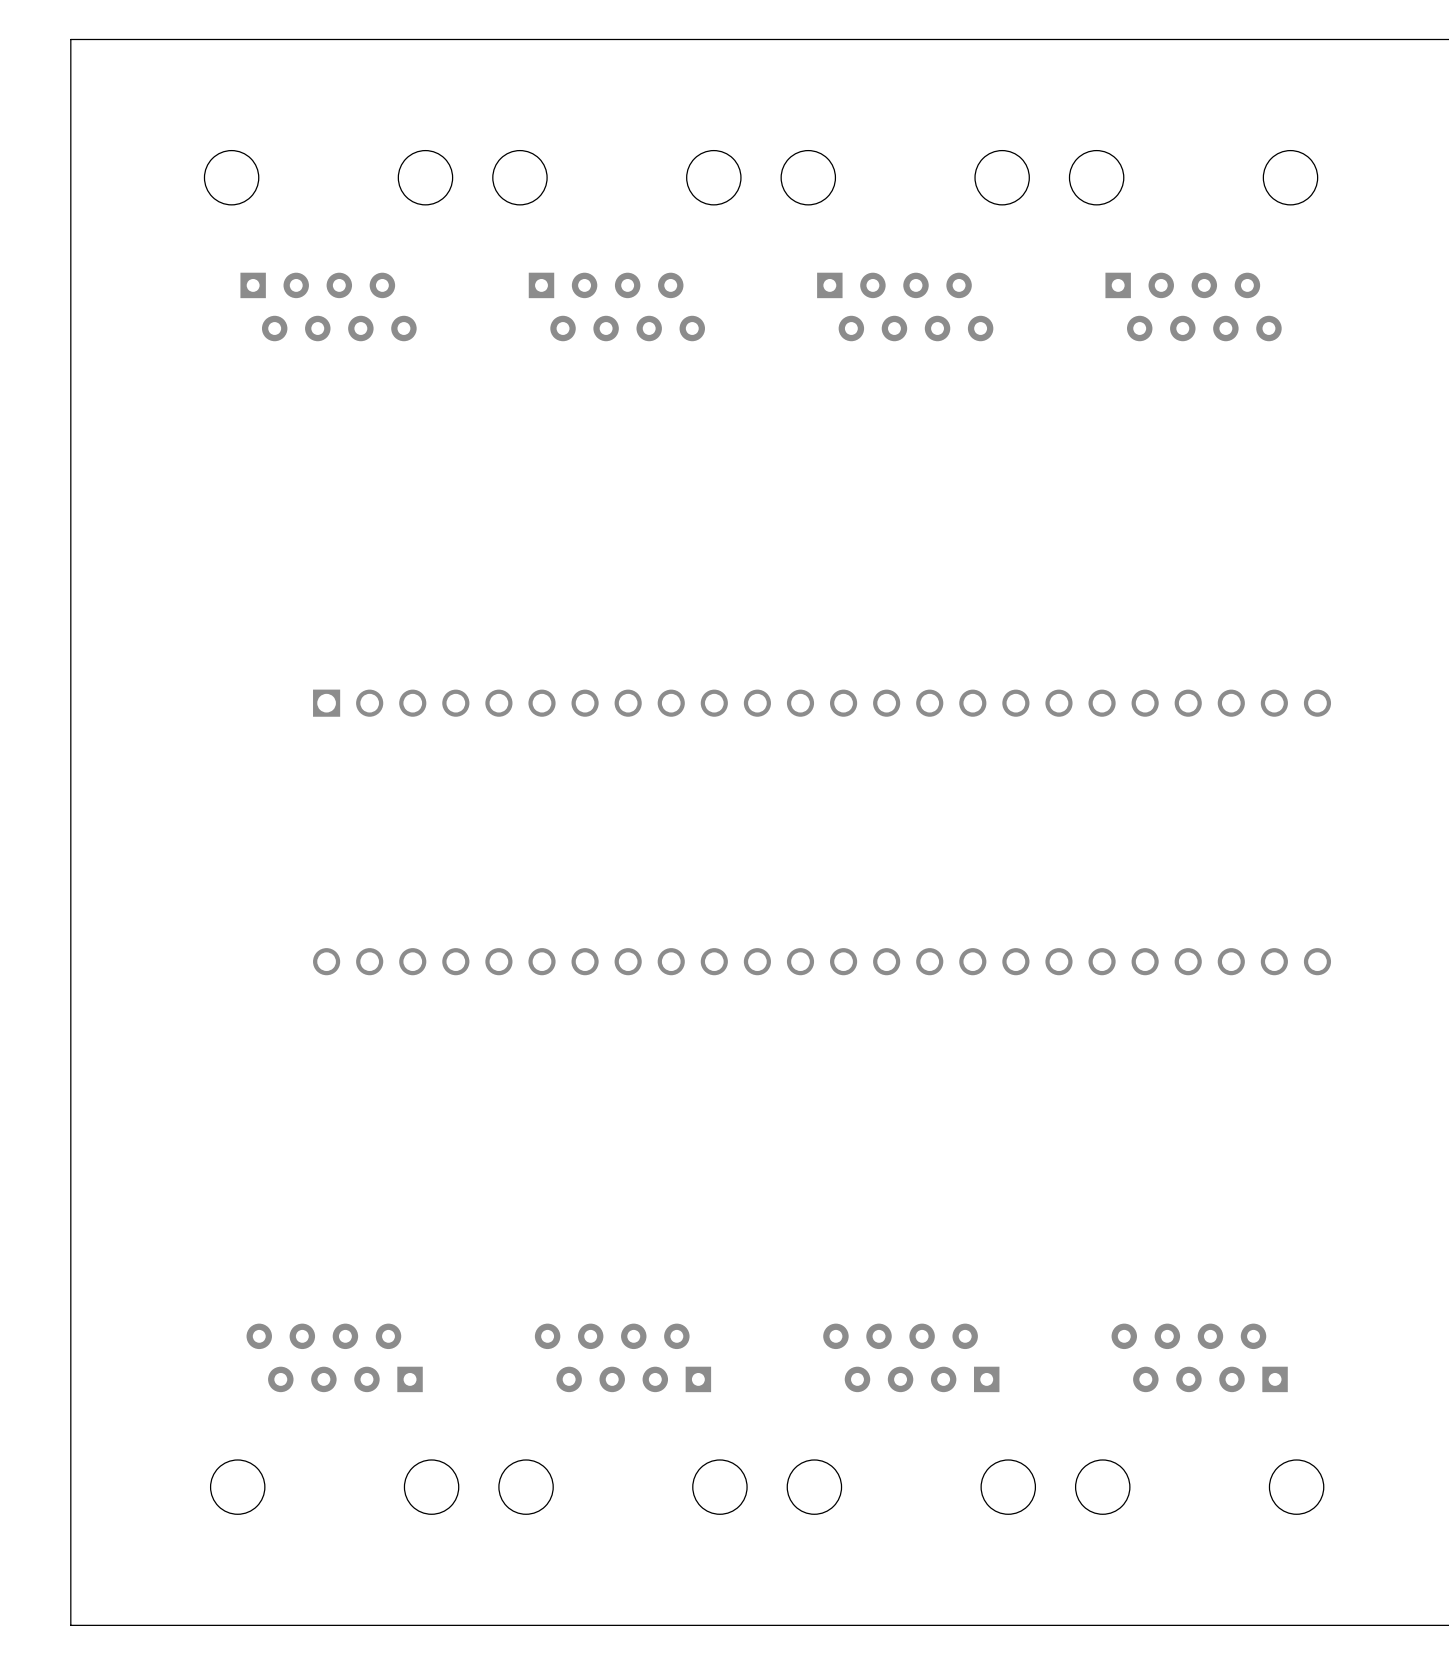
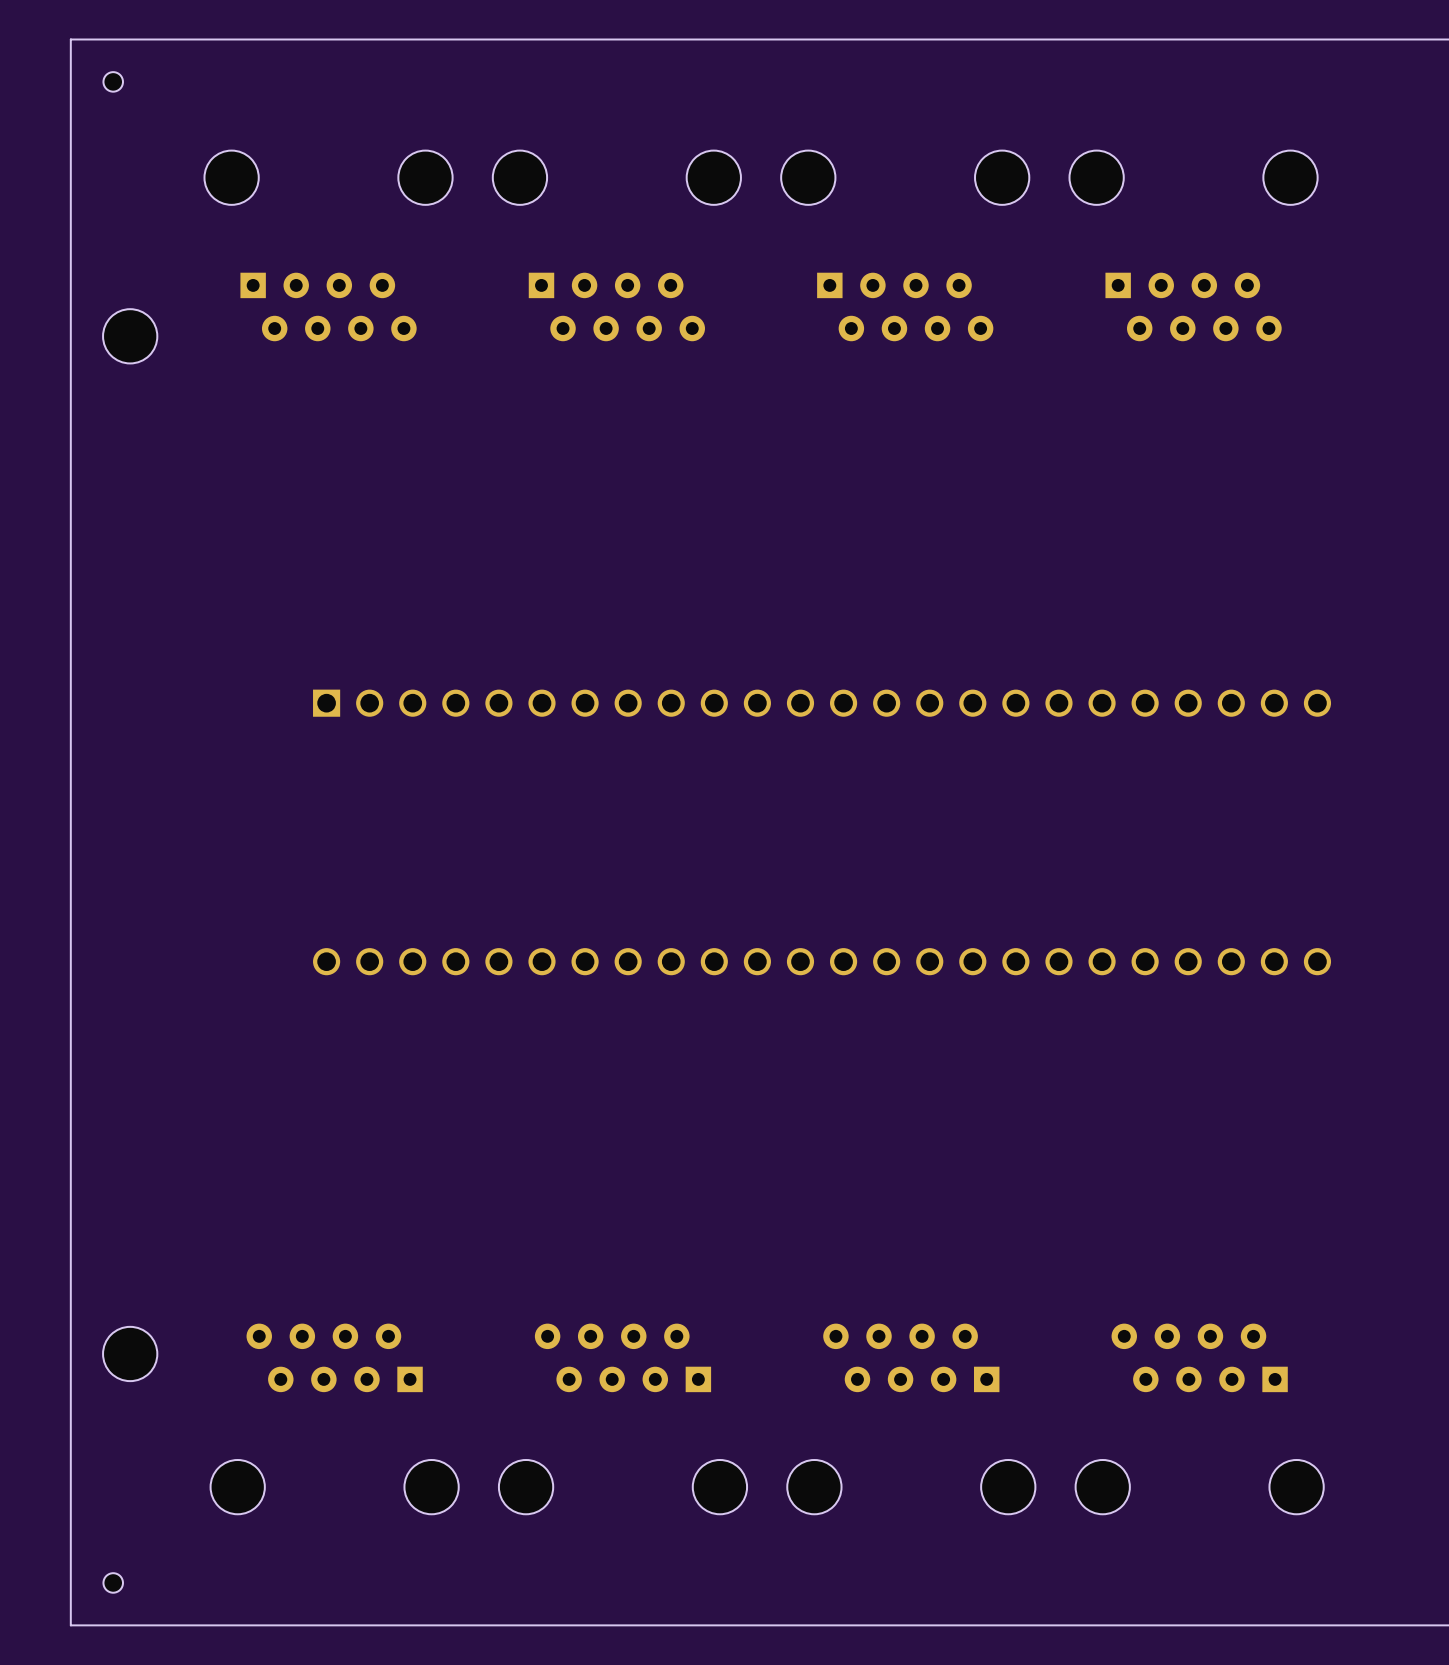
part: none -> (113, 81)
part: none -> (130, 336)
part: none -> (130, 1353)
part: none -> (113, 1582)

